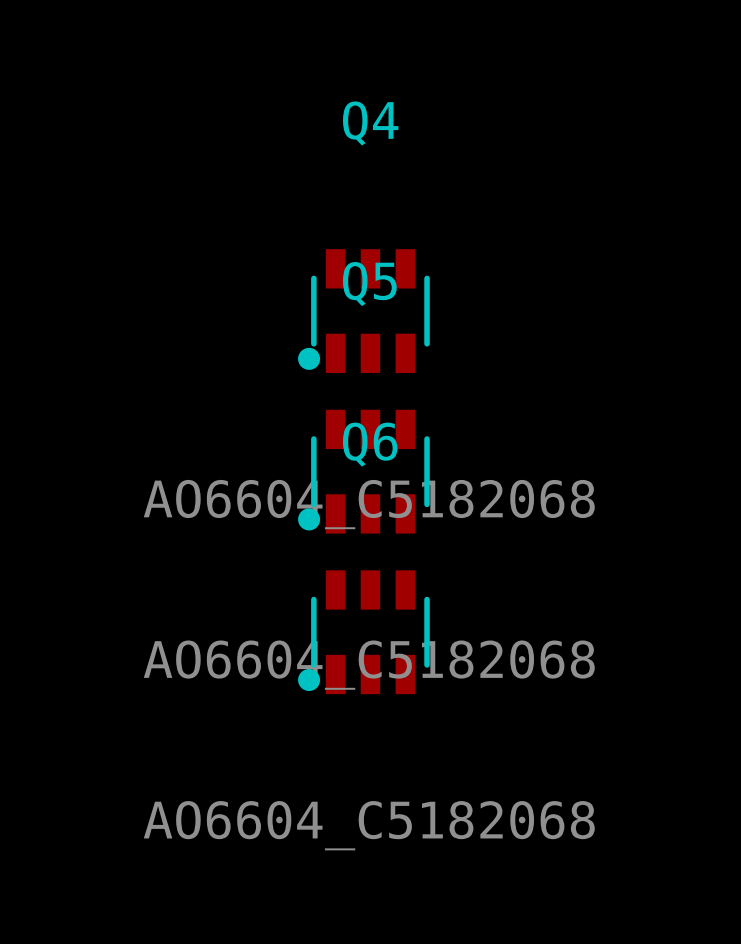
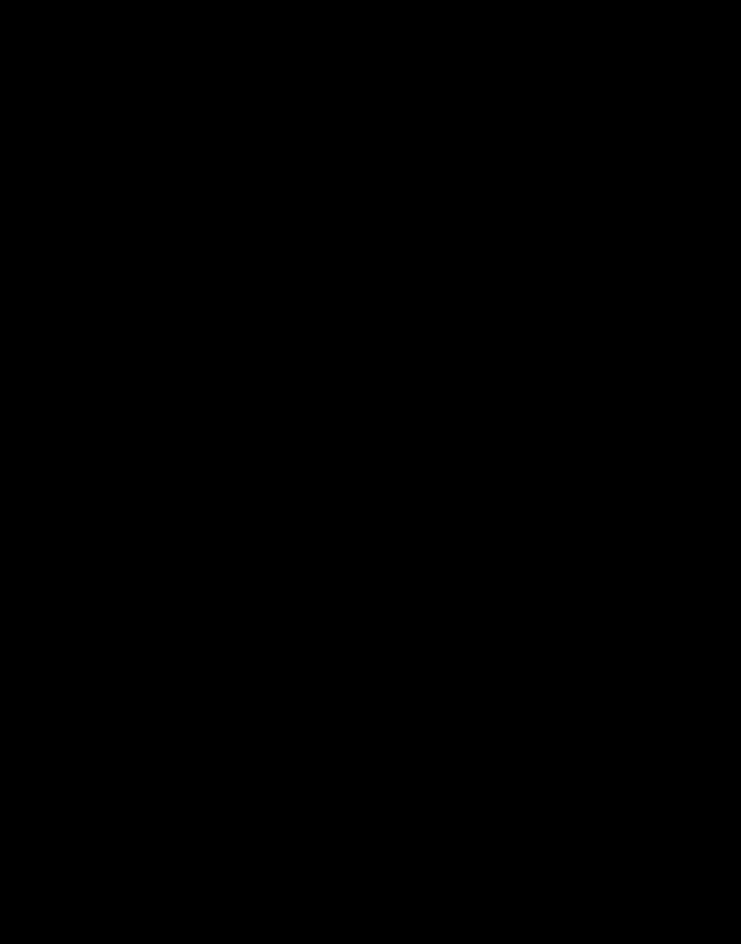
Q4: AO6604_C5182068 (363, 311) -> none
Q5: AO6604_C5182068 (363, 471) -> none
Q6: AO6604_C5182068 (363, 632) -> none

